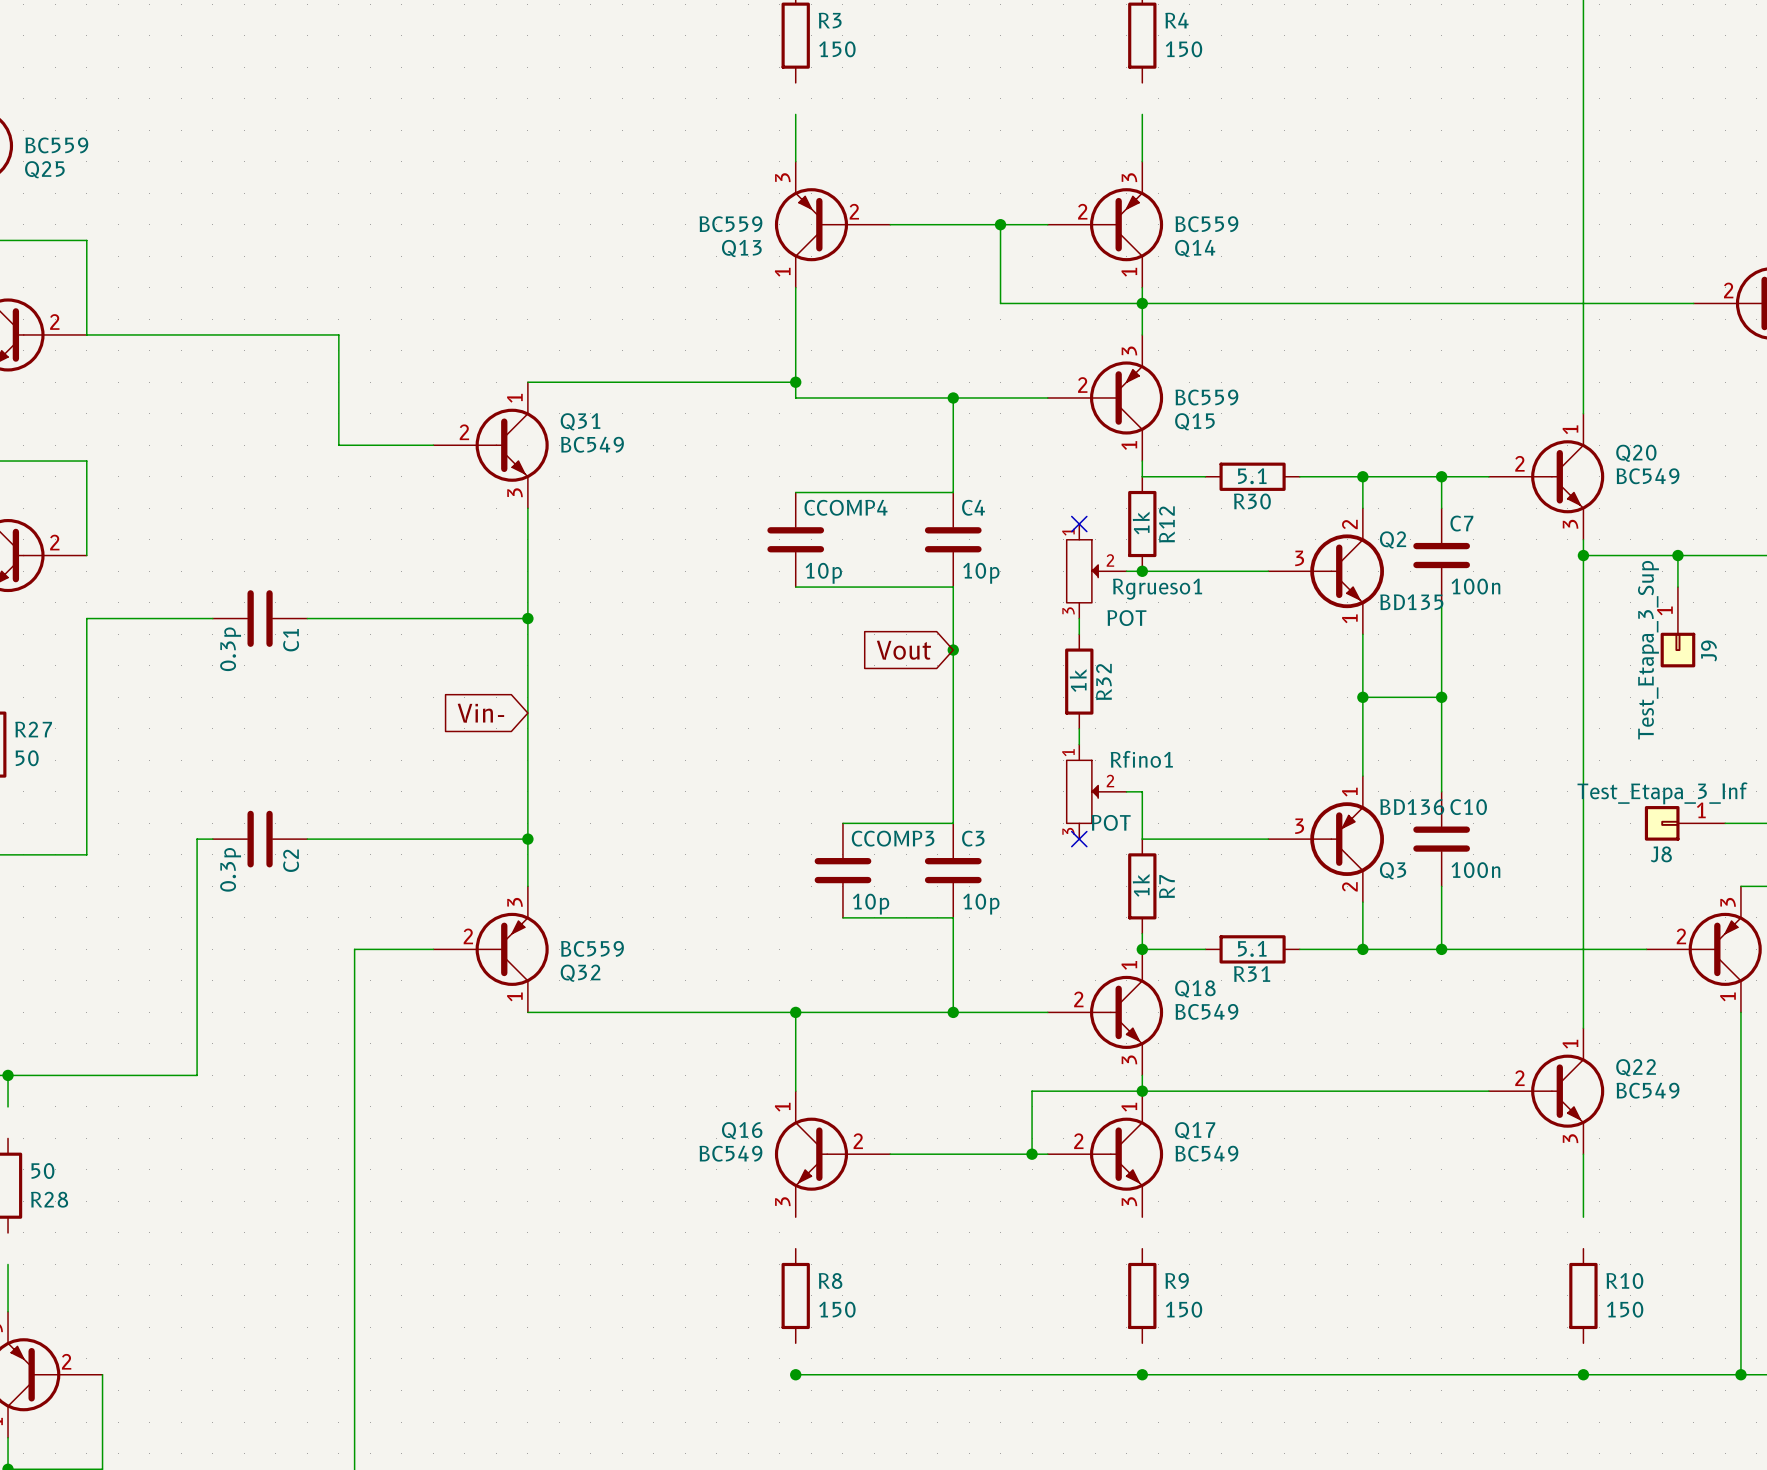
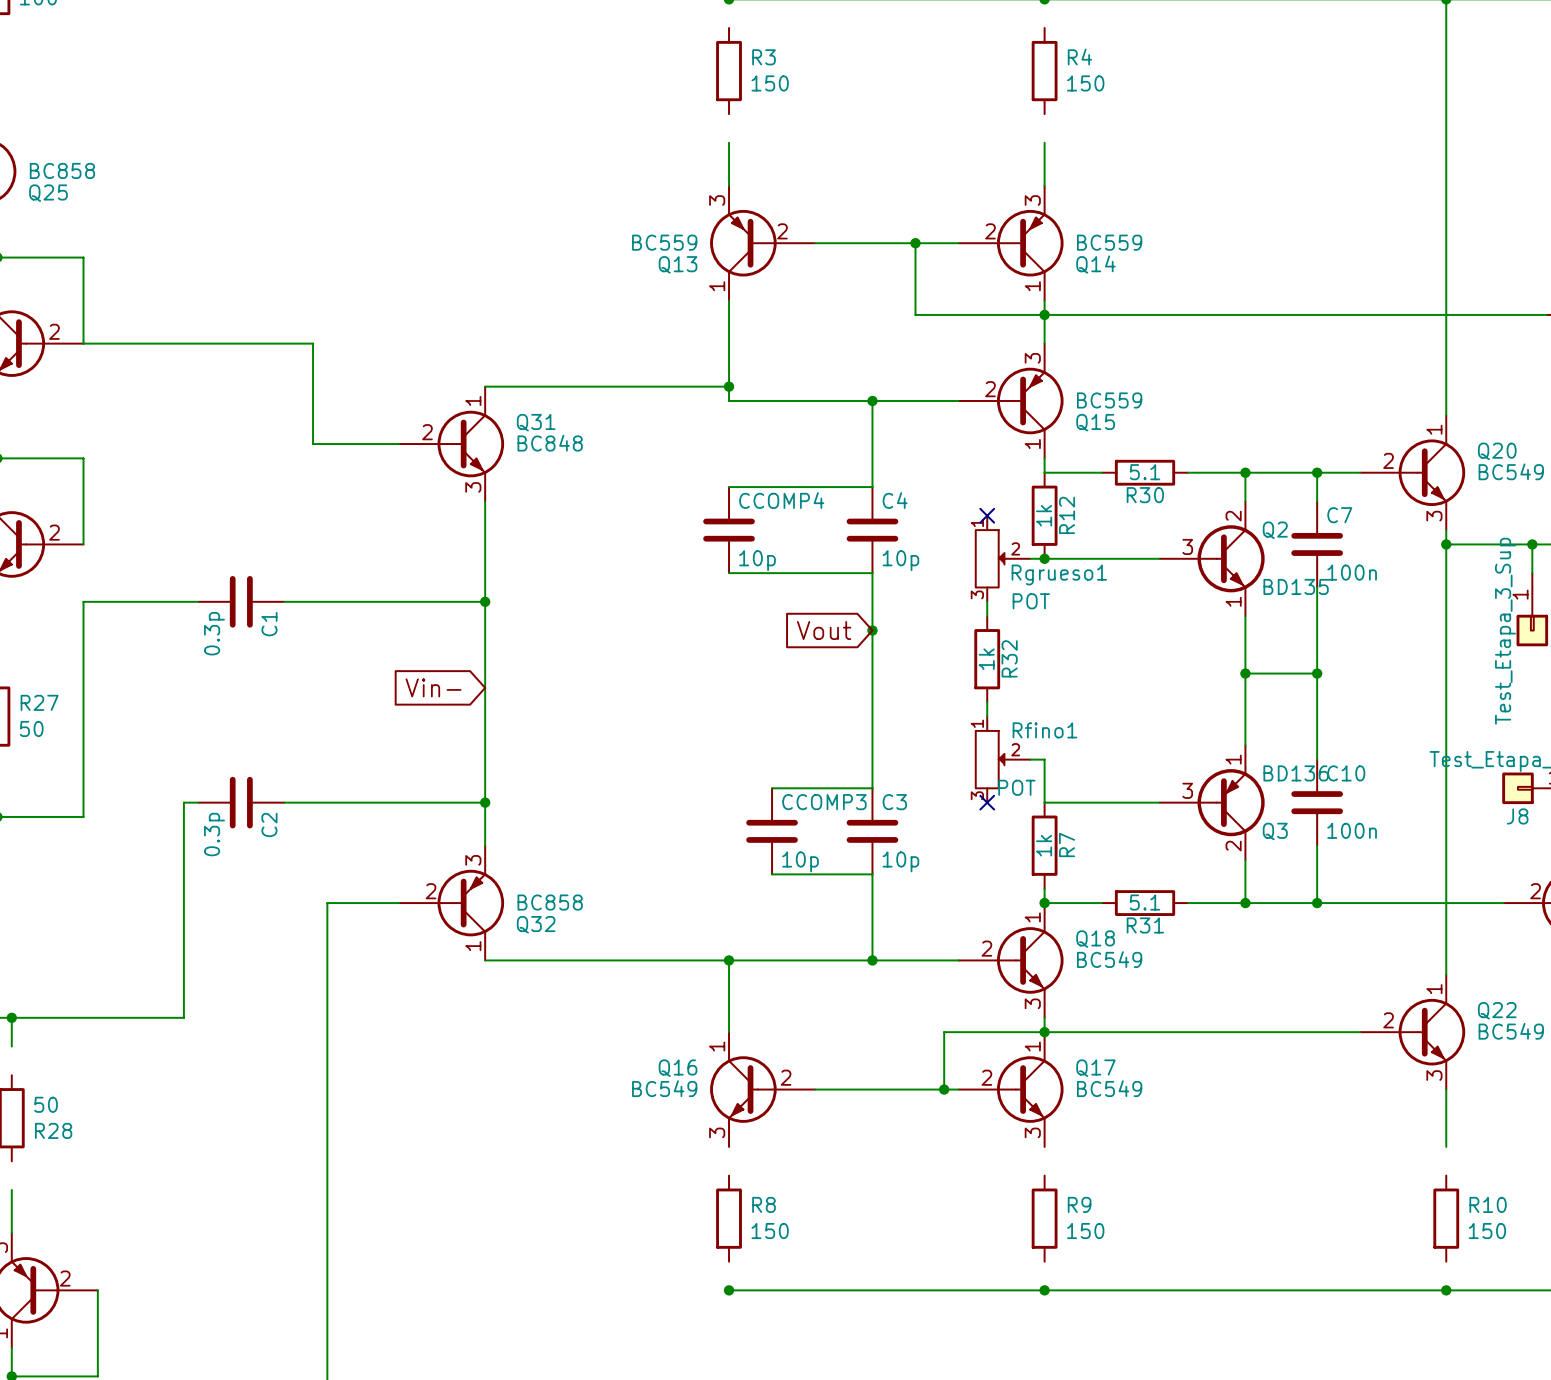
Q25 value: BC559 (56, 145) -> BC858 (62, 170)
Q31 value: BC549 (592, 444) -> BC848 (550, 443)
Q32 value: BC559 (592, 948) -> BC858 (550, 902)

